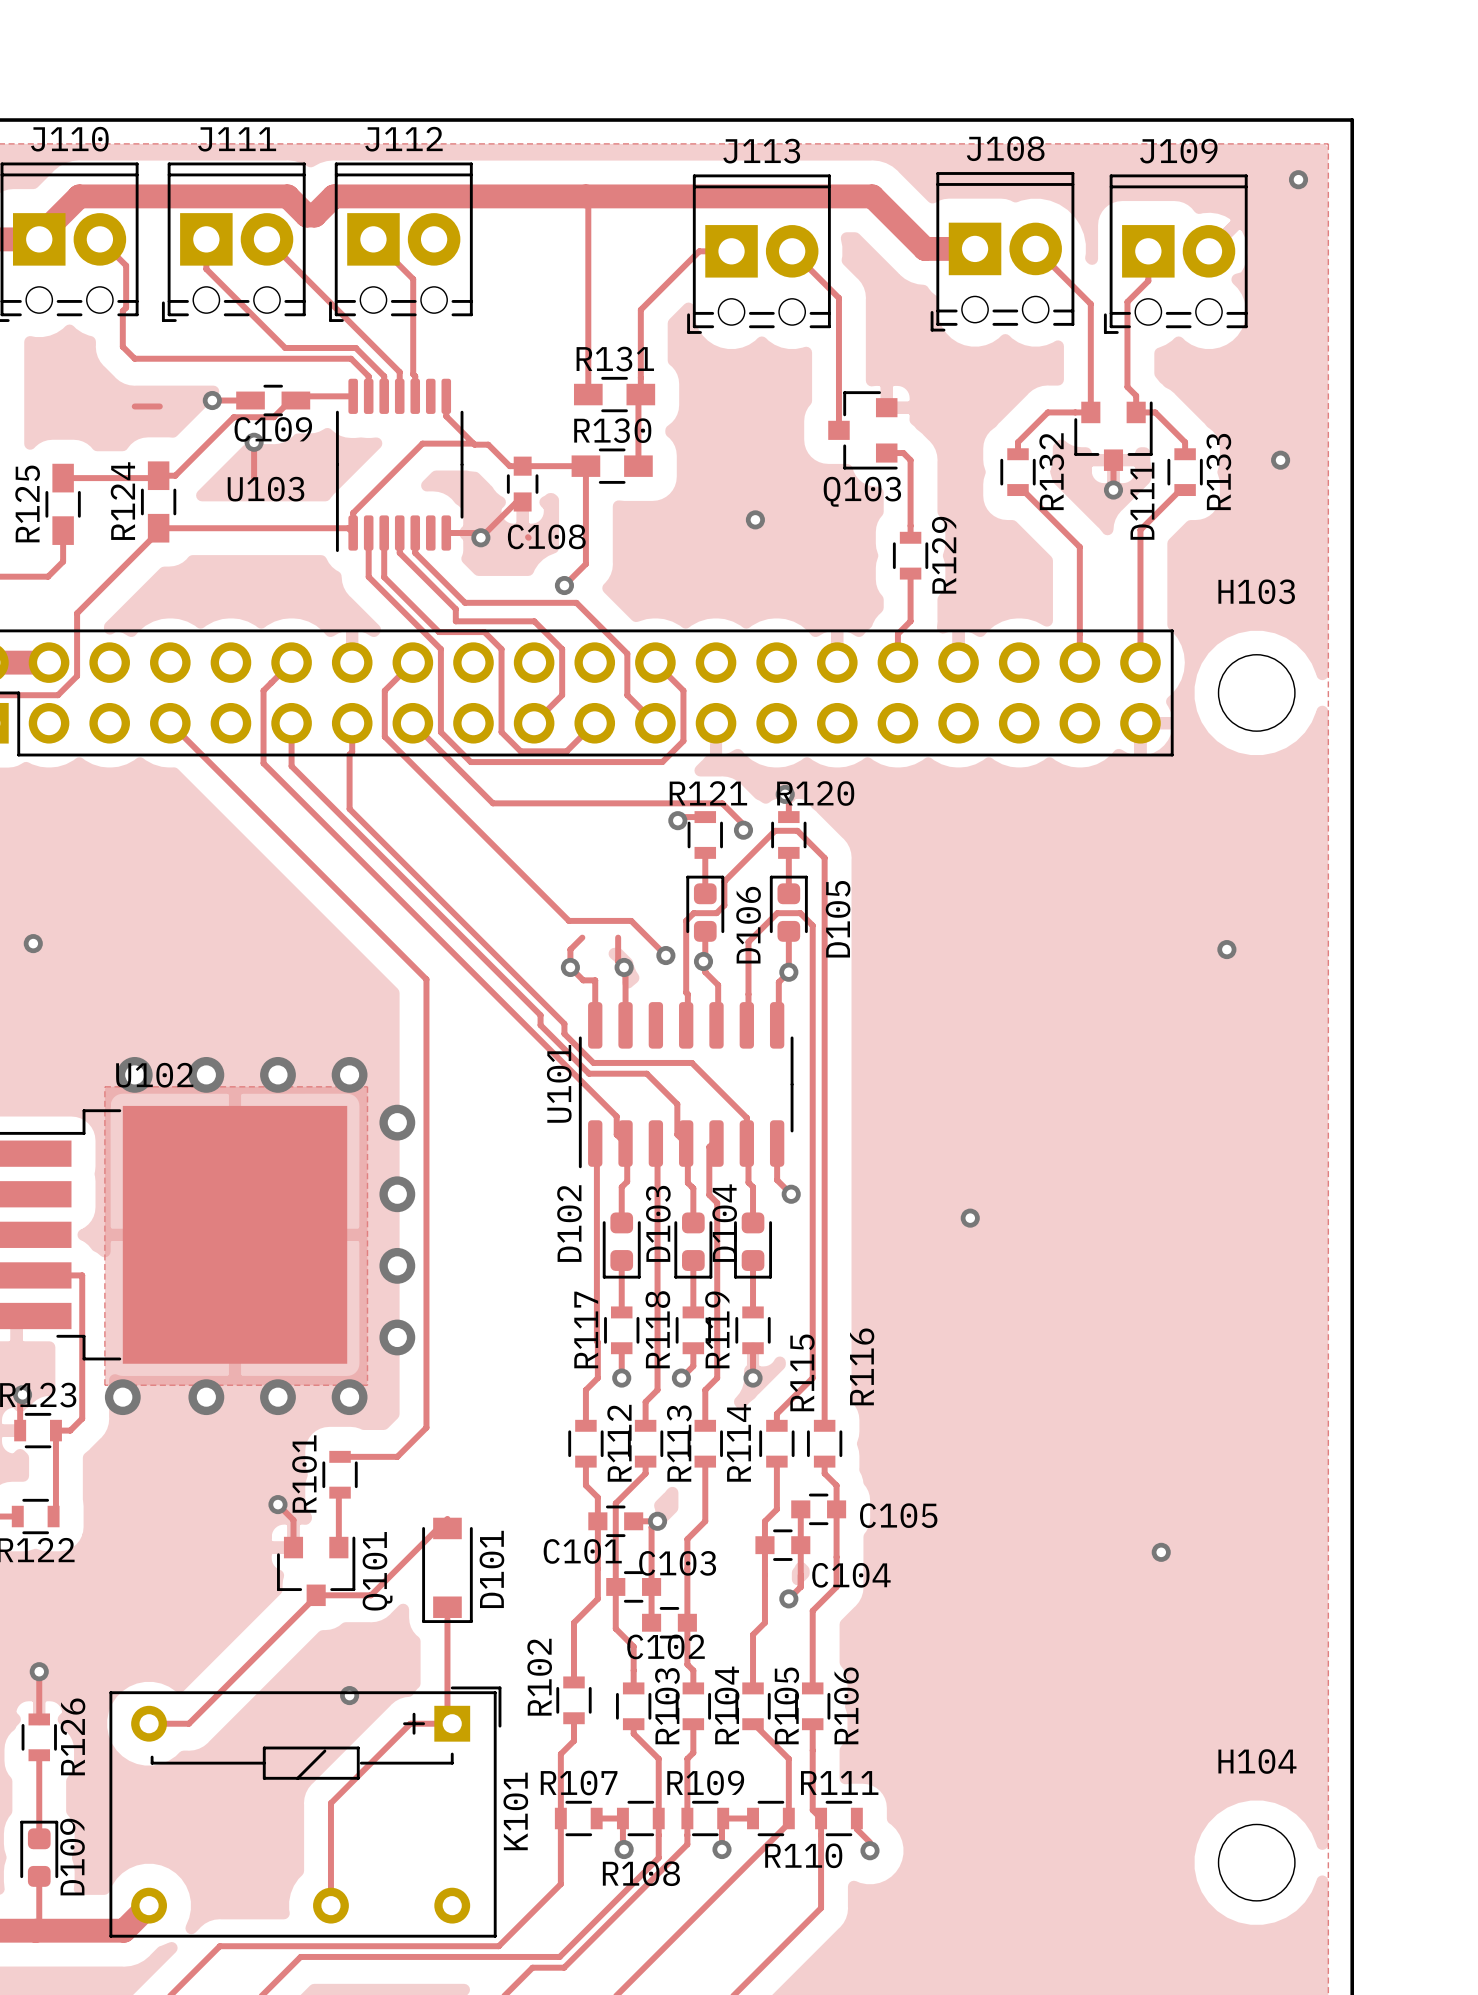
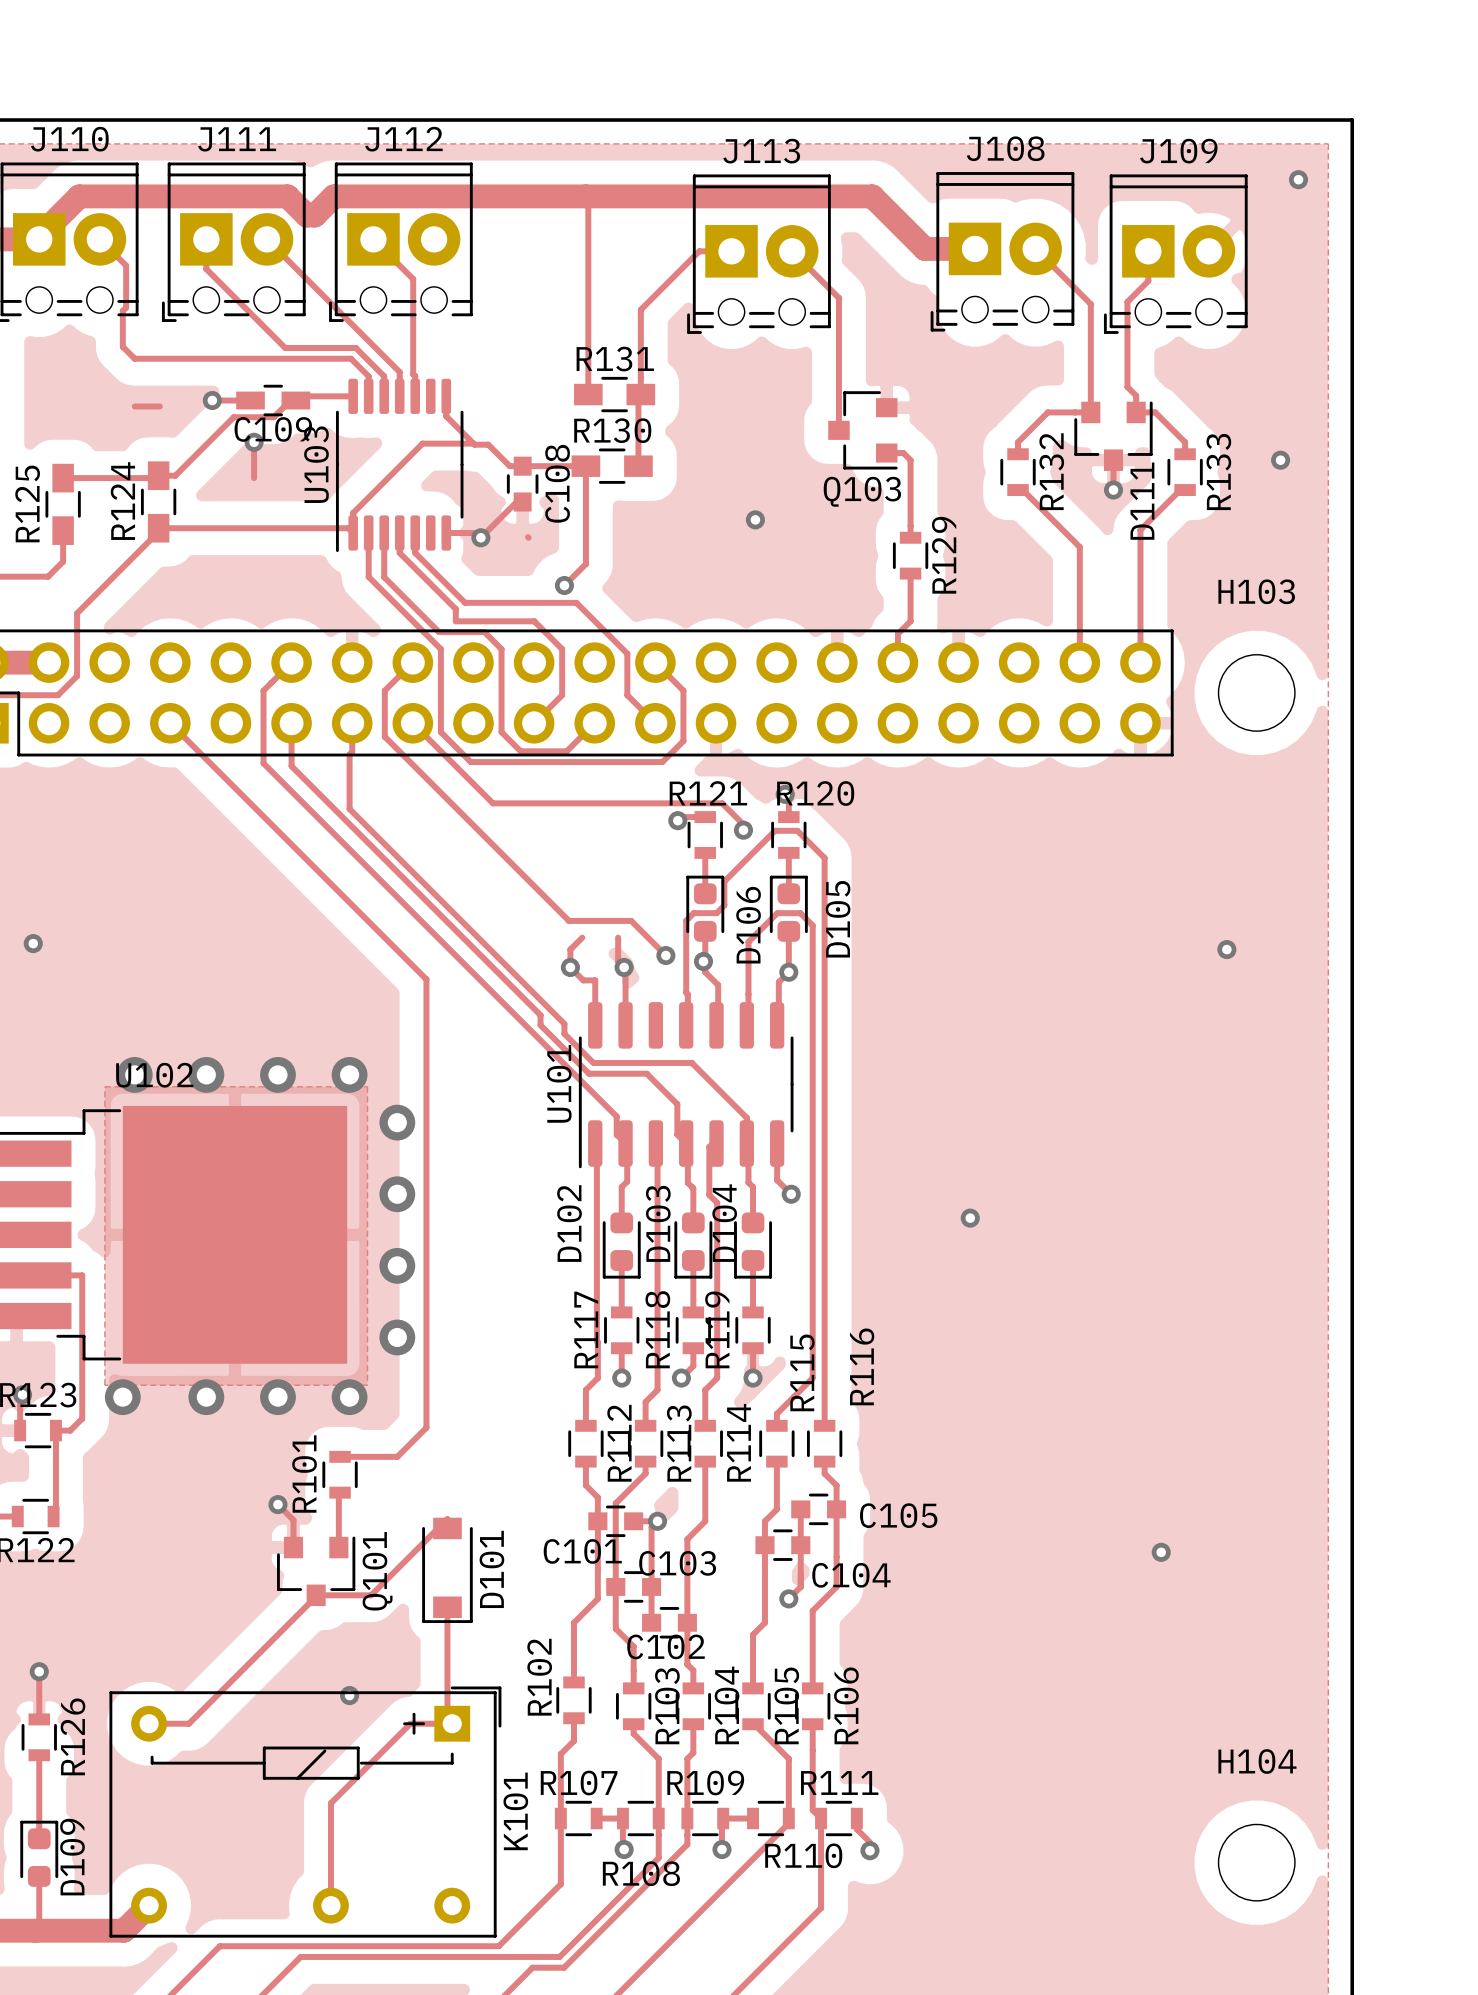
U103 name rotation: 0° (266, 489) -> 90° counterclockwise (316, 464)
C108 name rotation: 0° (546, 536) -> 90° counterclockwise (557, 483)

